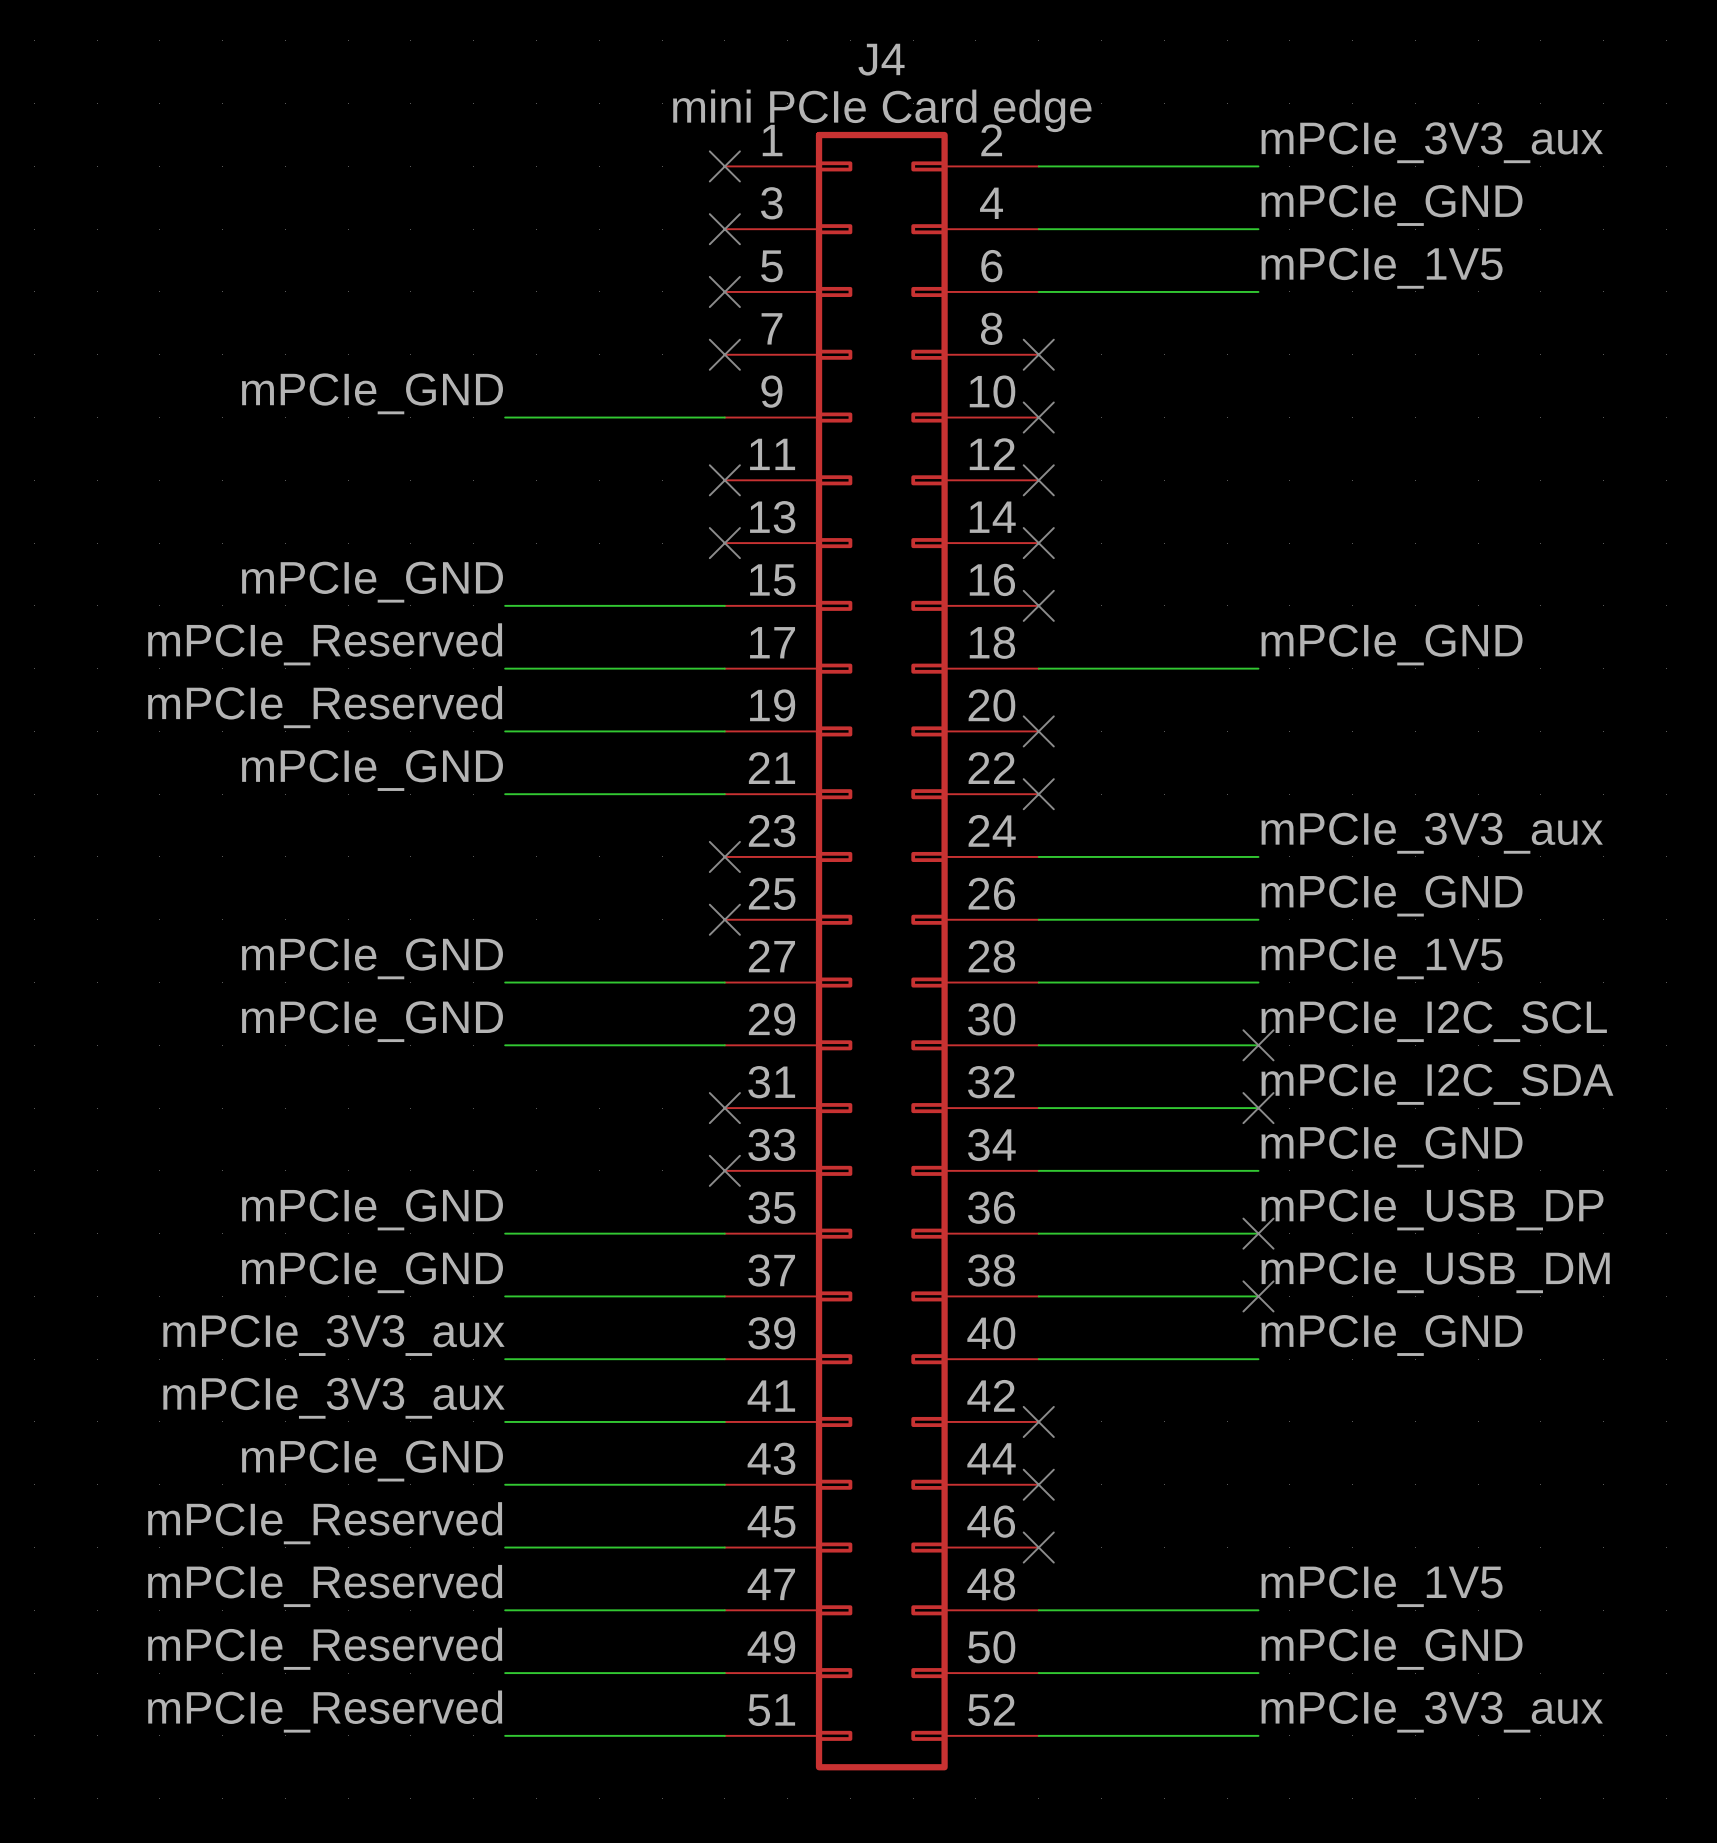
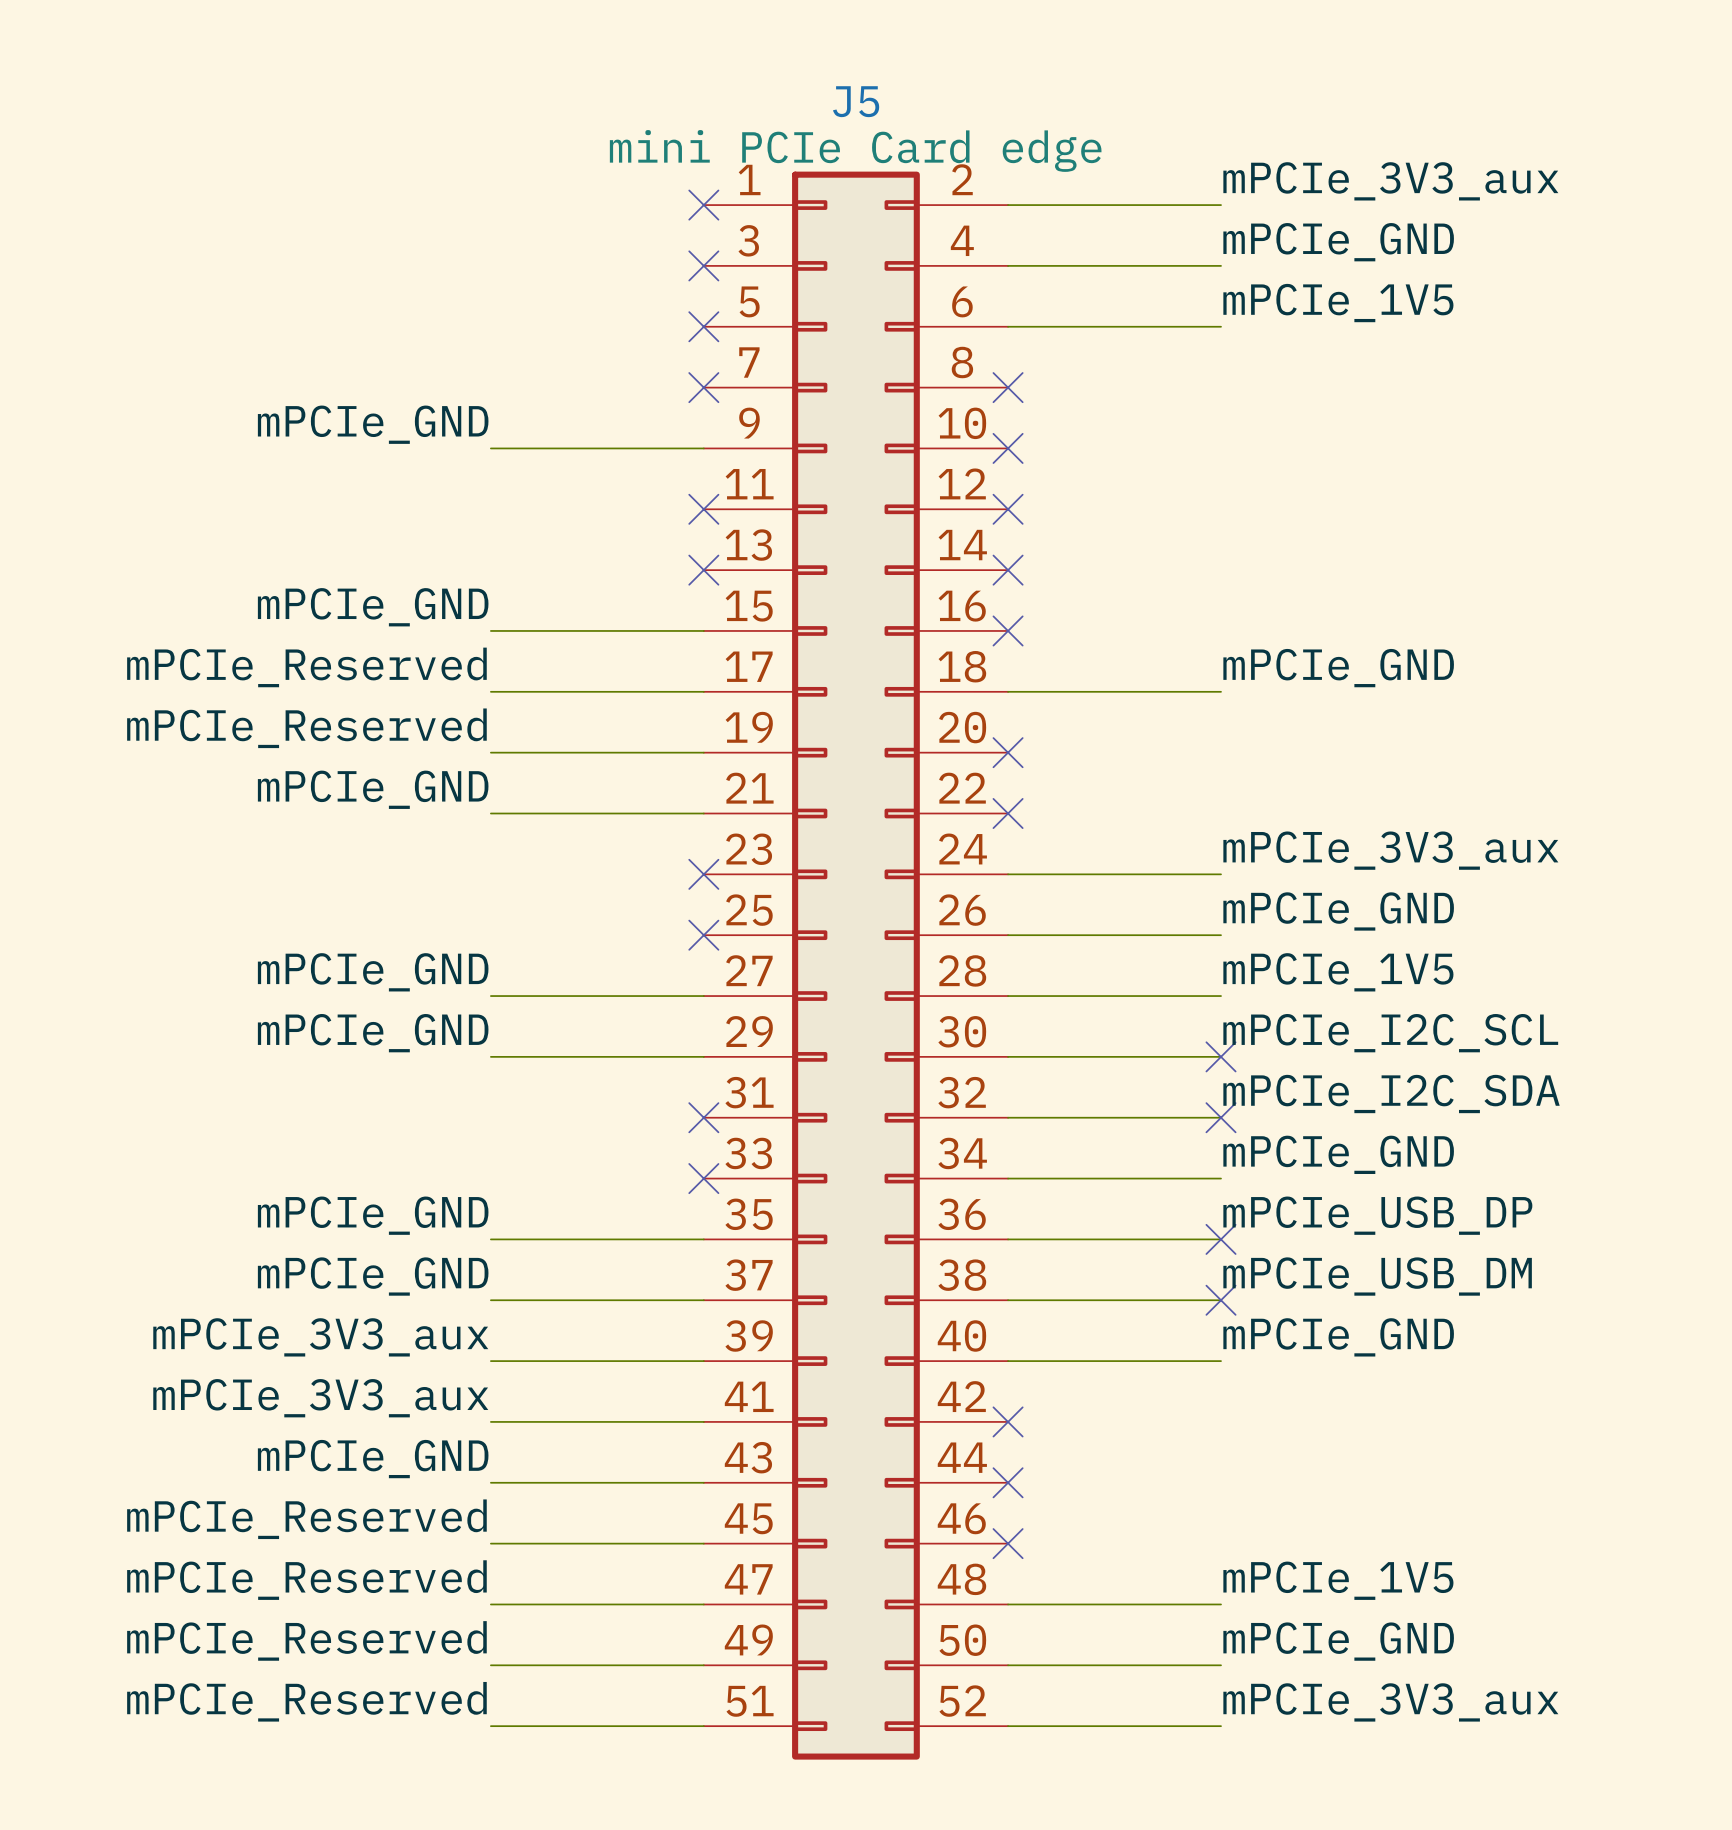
J4 name: J4 (881, 59) -> J5 (856, 101)

